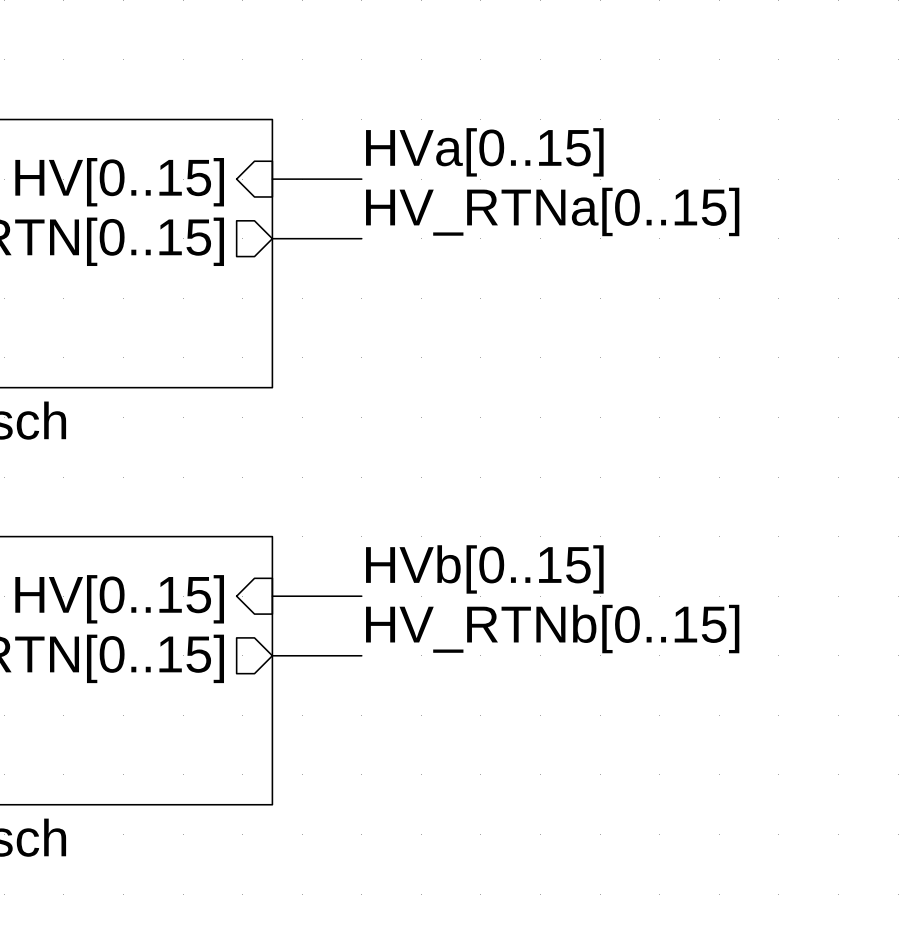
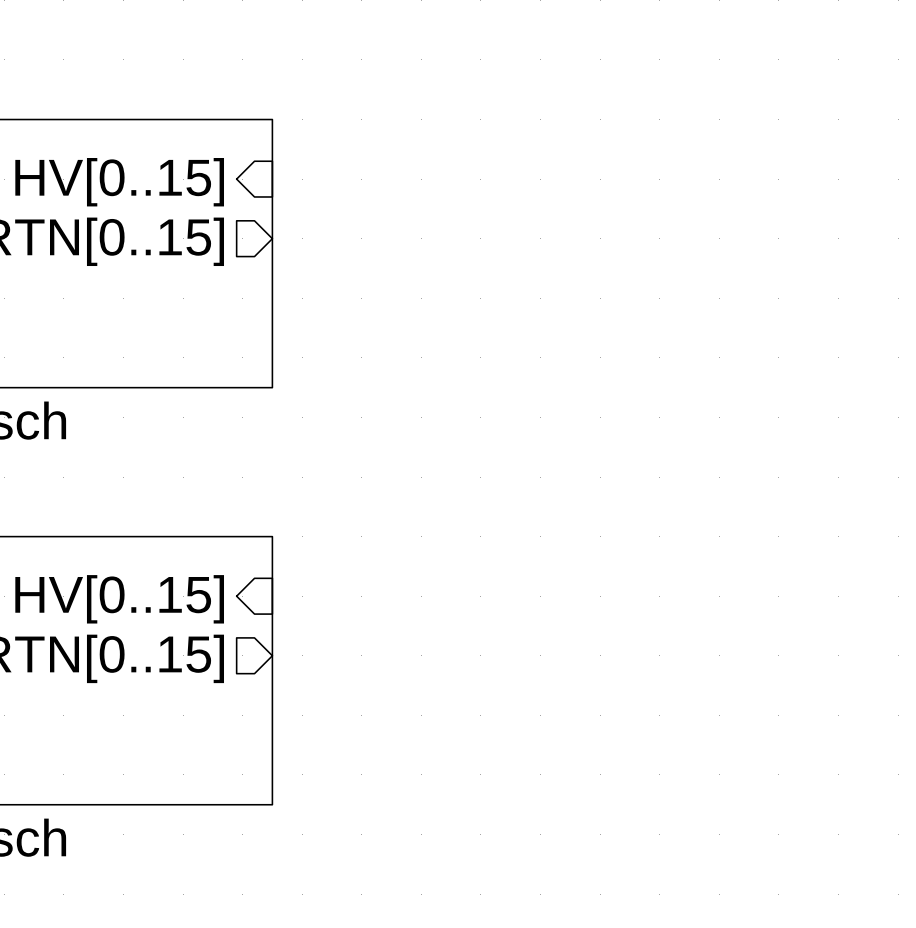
label: HVa[0..15] (484, 152) -> none
bus: (272, 179) (361, 179) -> none
label: HV_RTNa[0..15] (552, 211) -> none
bus: (272, 238) (361, 238) -> none
label: HVb[0..15] (484, 569) -> none
bus: (272, 596) (361, 596) -> none
label: HV_RTNb[0..15] (552, 629) -> none
bus: (272, 655) (361, 655) -> none

